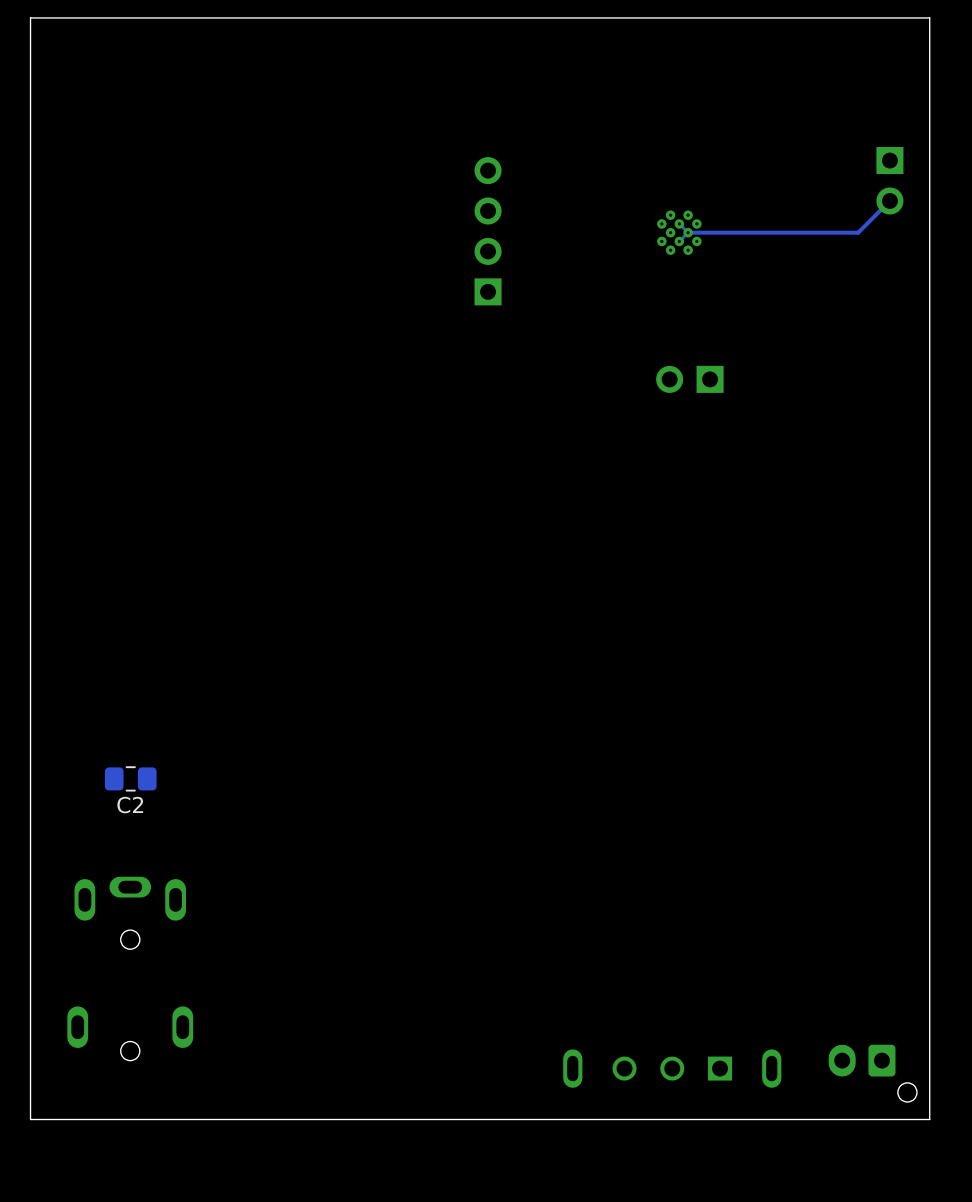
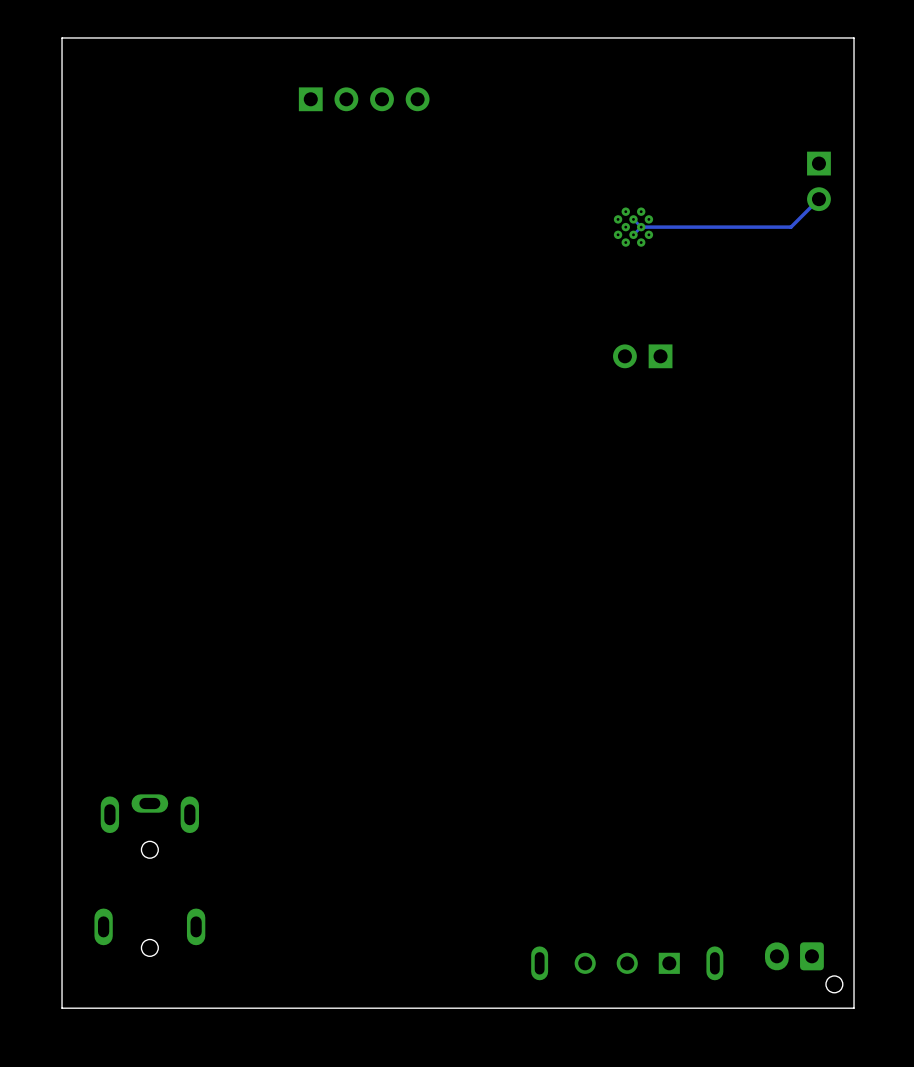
part rotation: 0° (488, 231) -> 90° clockwise (364, 99)
part position: (488, 231) -> (364, 99)
C2: (130, 778) -> none

